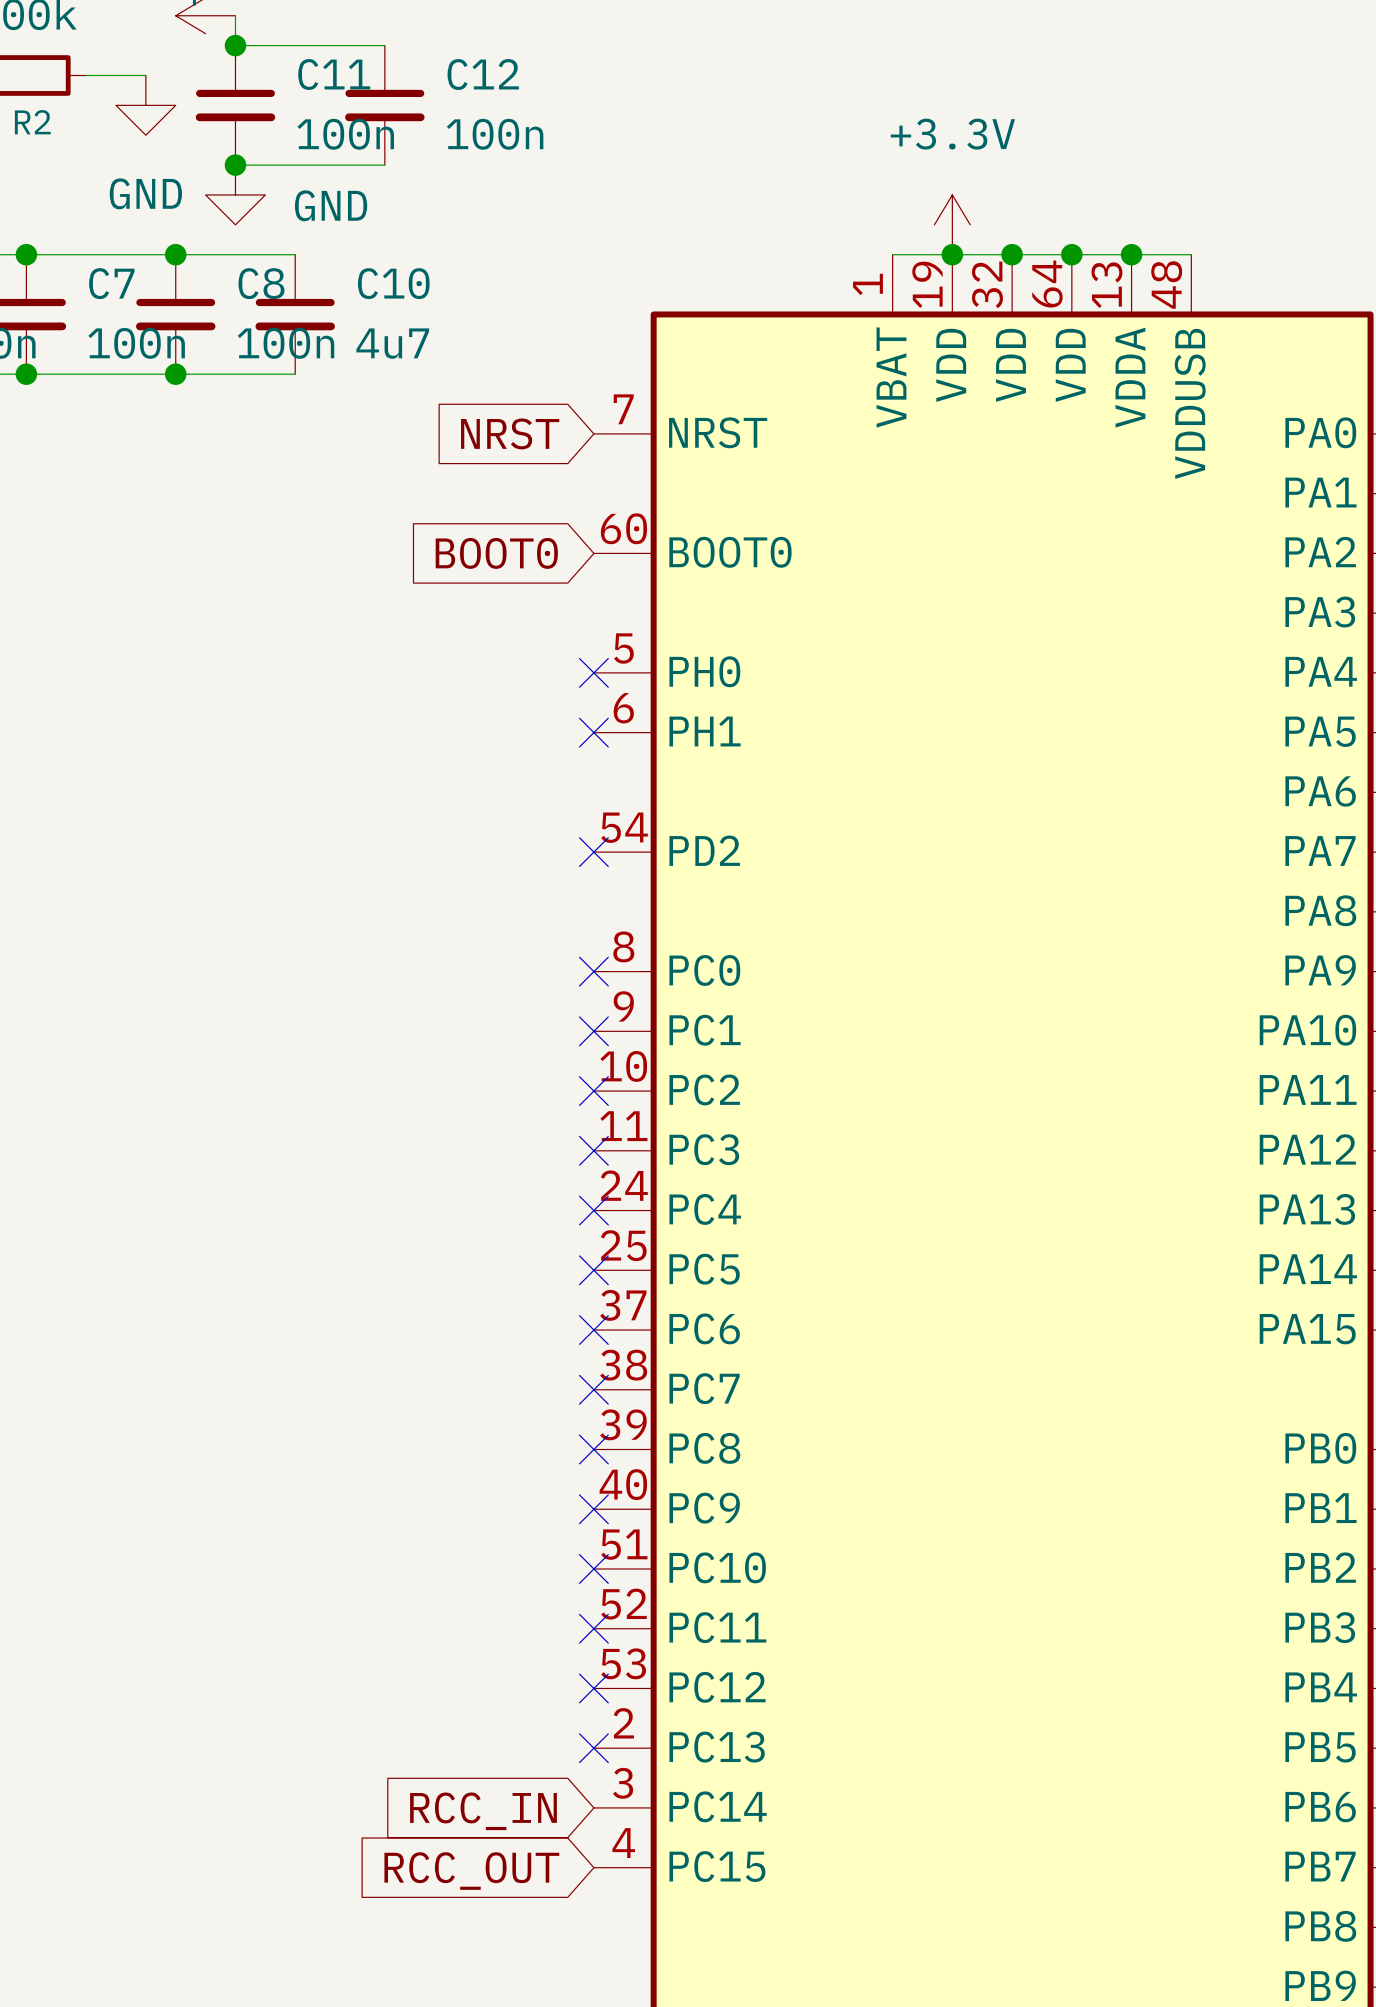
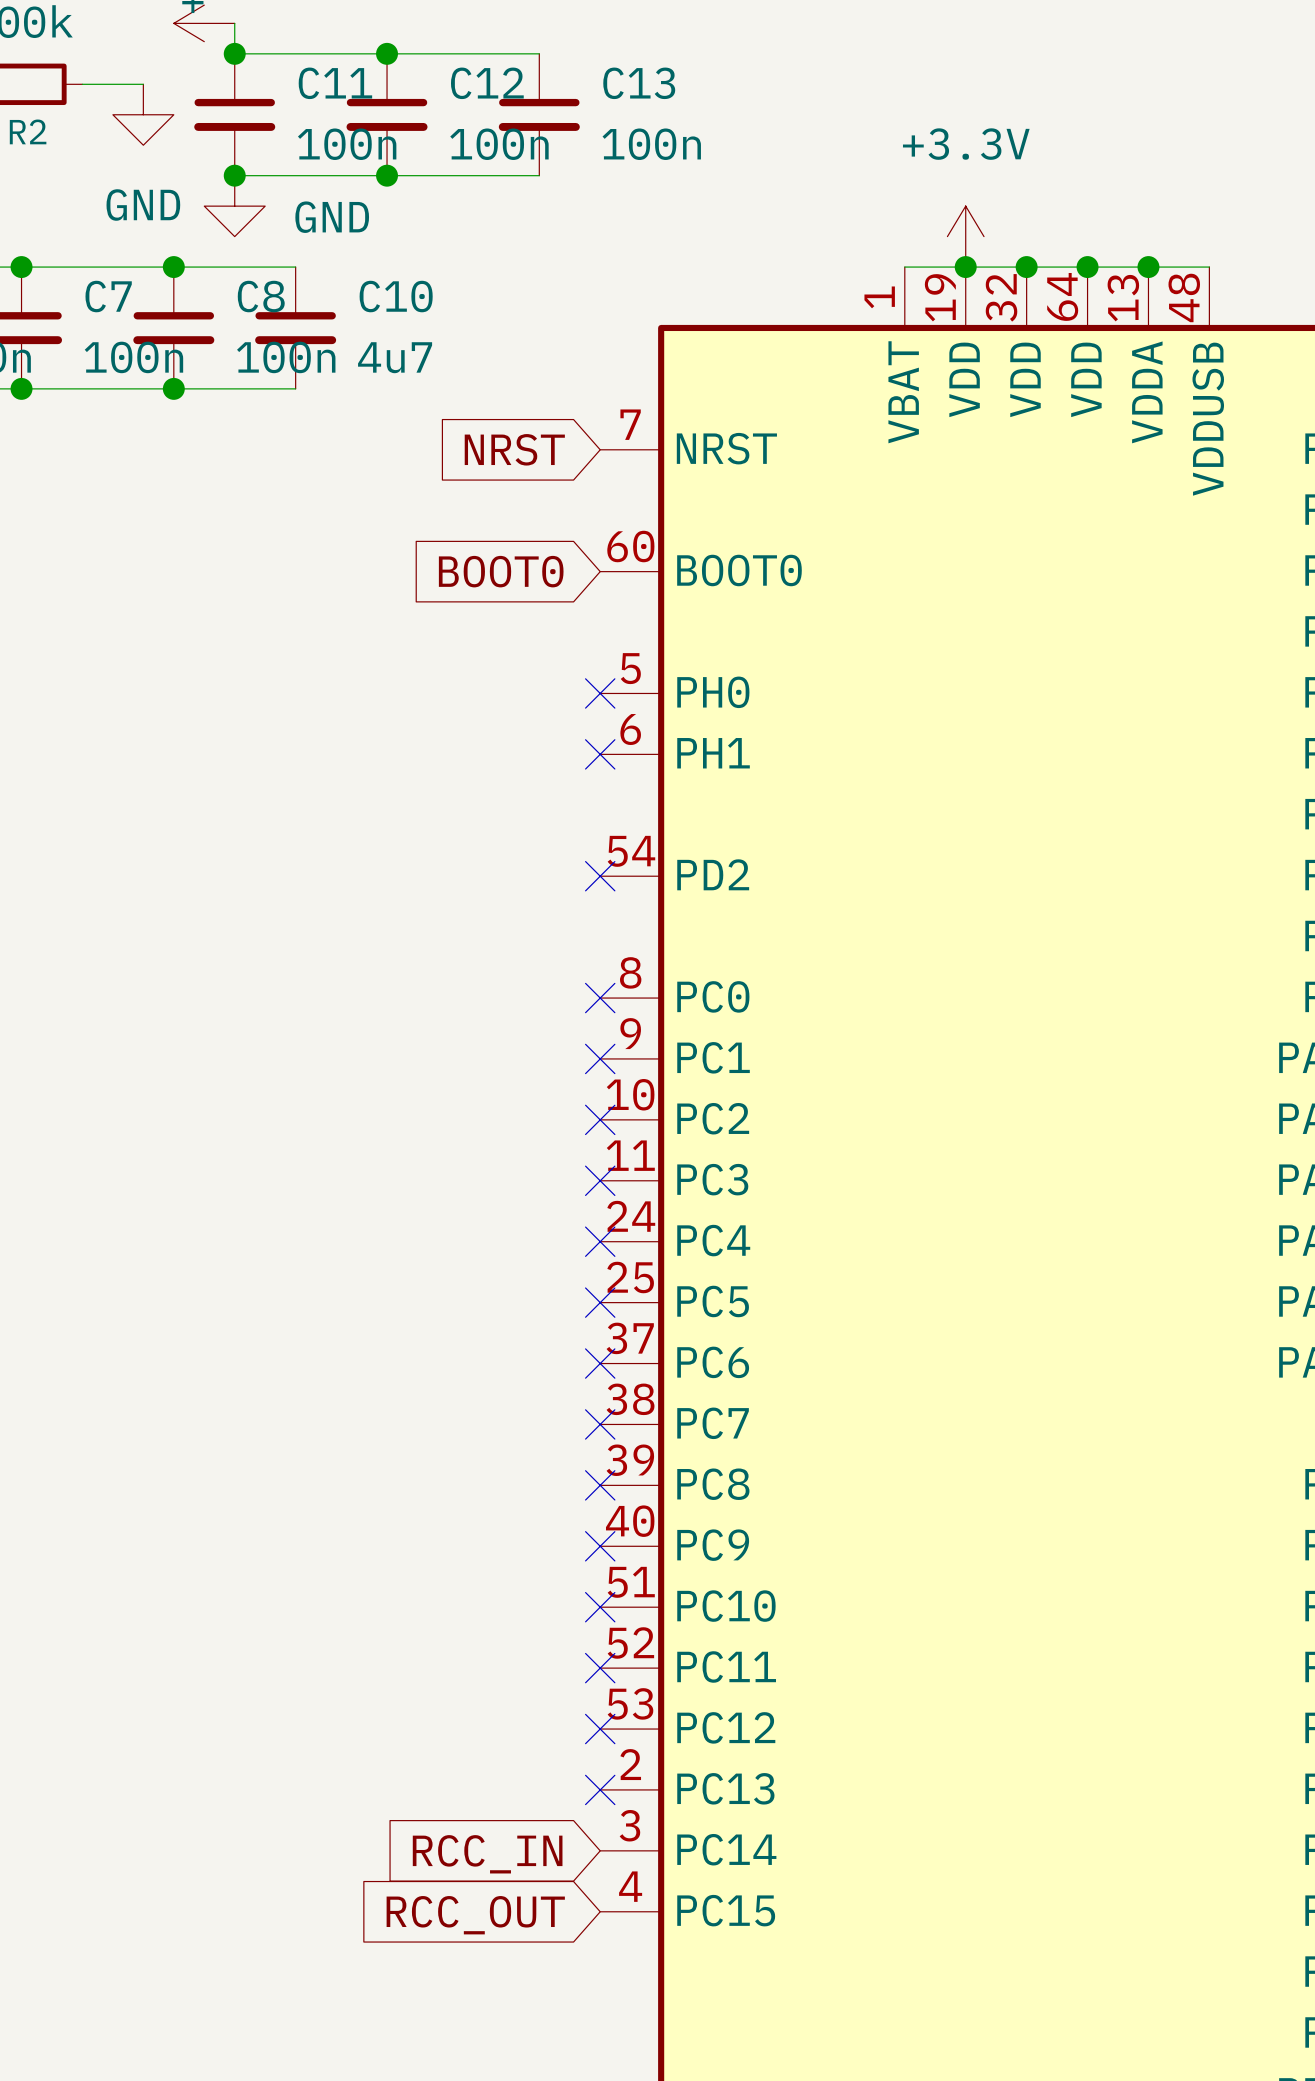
wire: none -> (387, 53) (539, 53)
junction: none -> (387, 53)
C13: none -> 100n (539, 114)
wire: none -> (387, 175) (539, 175)
junction: none -> (387, 175)

